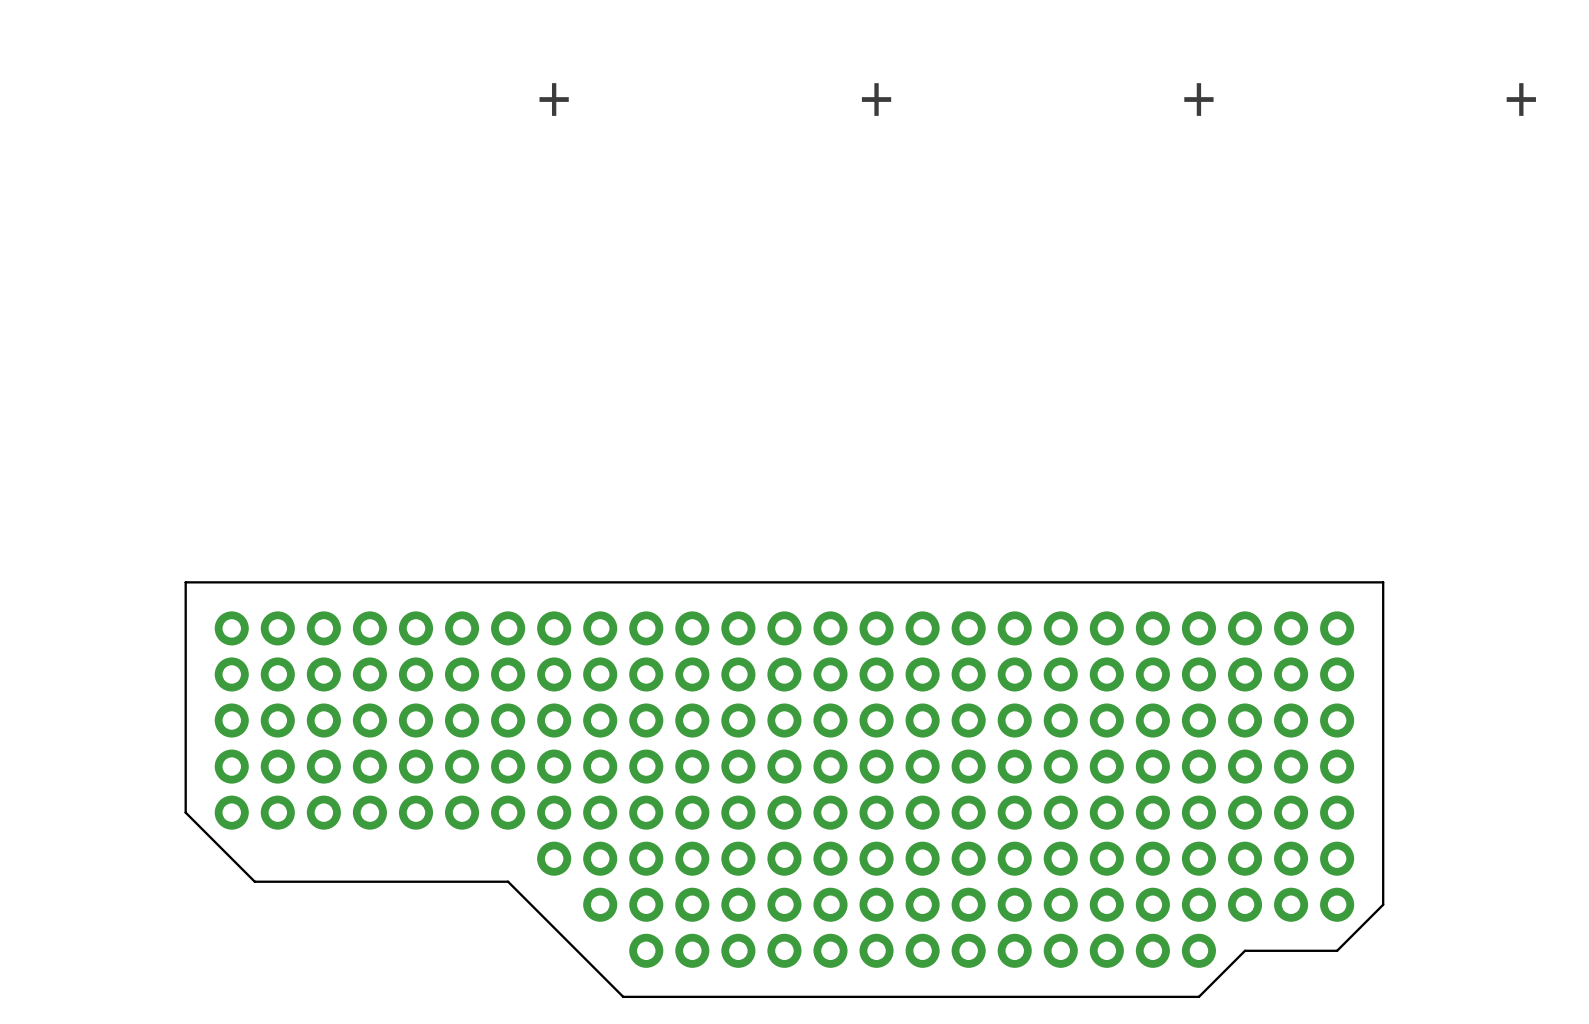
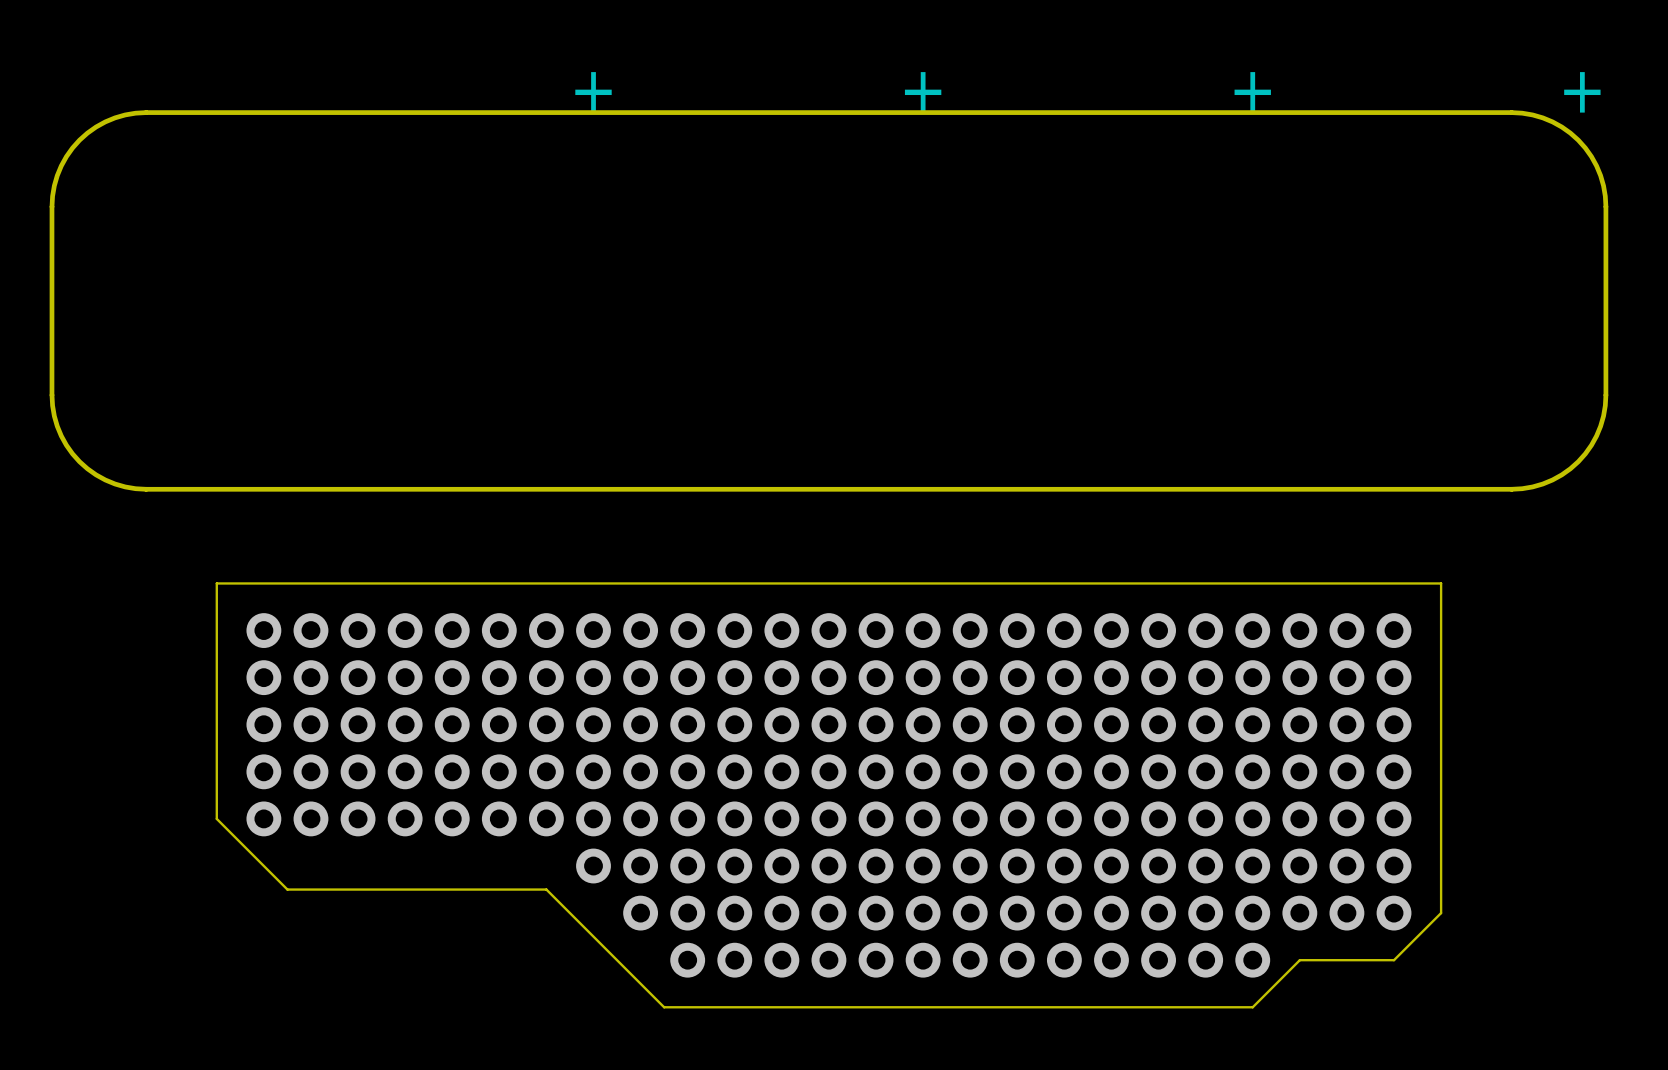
board edge: none -> (146, 112) (1511, 112) (1532, 114) (1561, 127) (1578, 140) (1591, 156) (1603, 185) (1605, 206) (1605, 395) (1603, 416) (1591, 445) (1570, 468) (1542, 484) (1511, 489) (146, 489) (125, 486) (96, 474) (79, 461) (66, 445) (54, 416) (51, 395) (51, 206) (54, 185) (61, 165) (79, 140) (105, 121) (125, 114) (146, 112)

